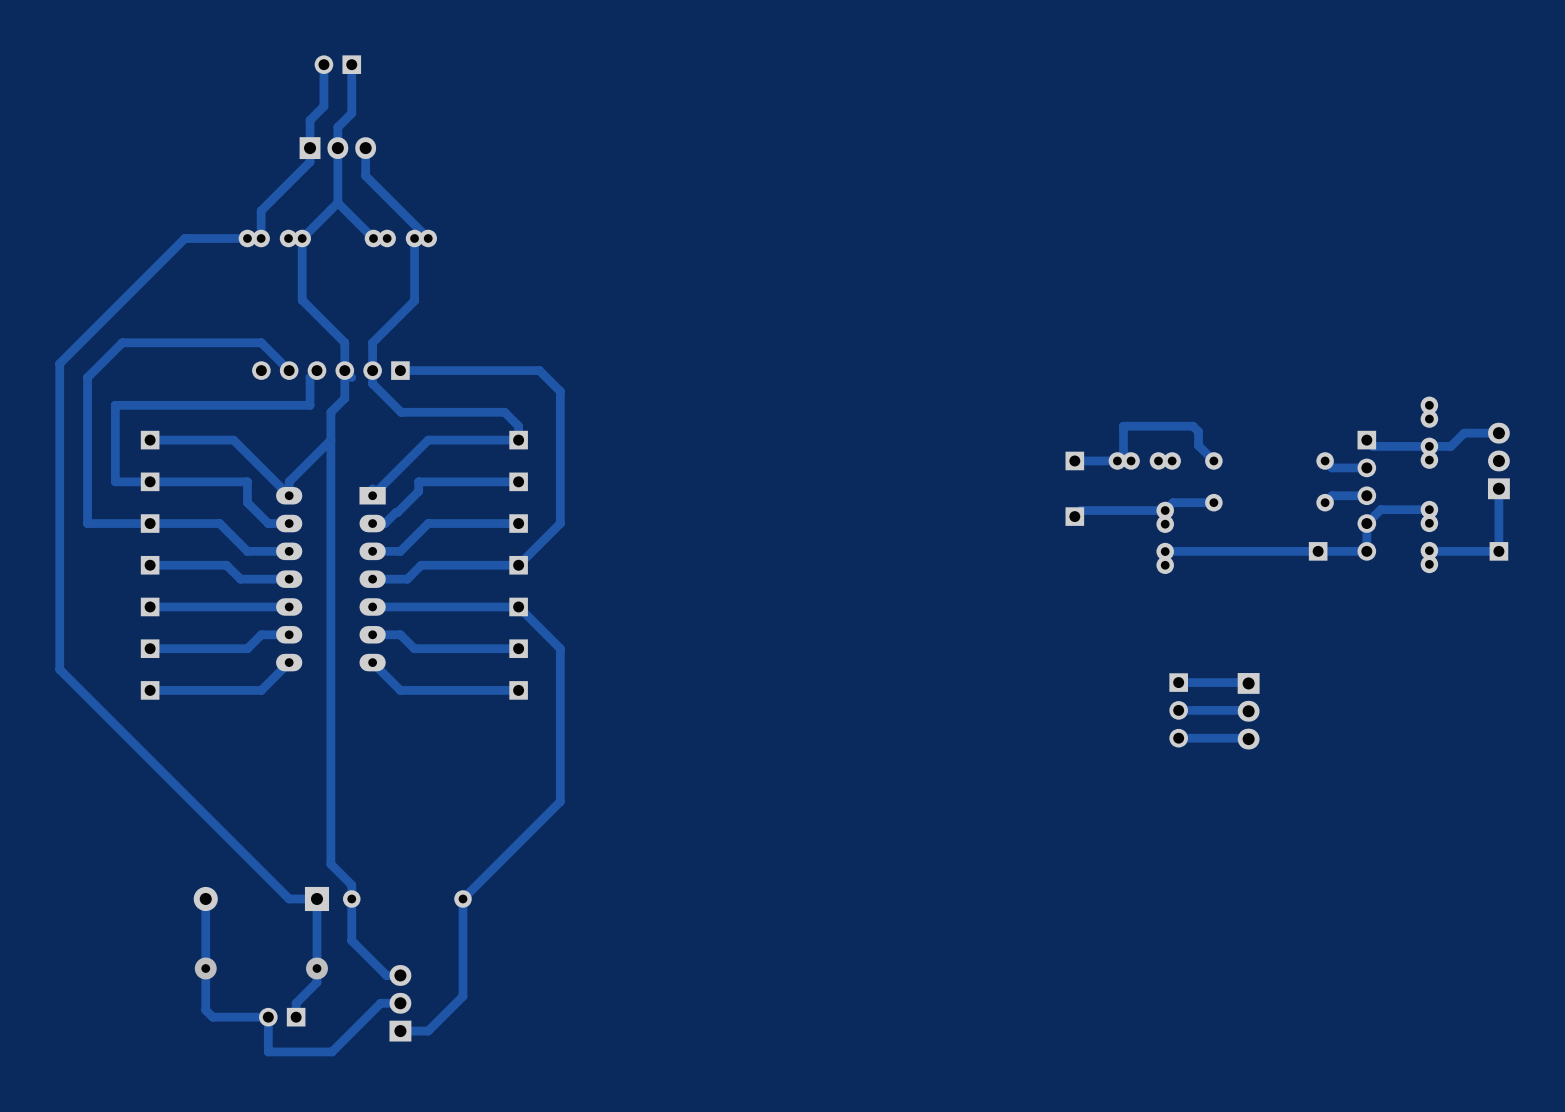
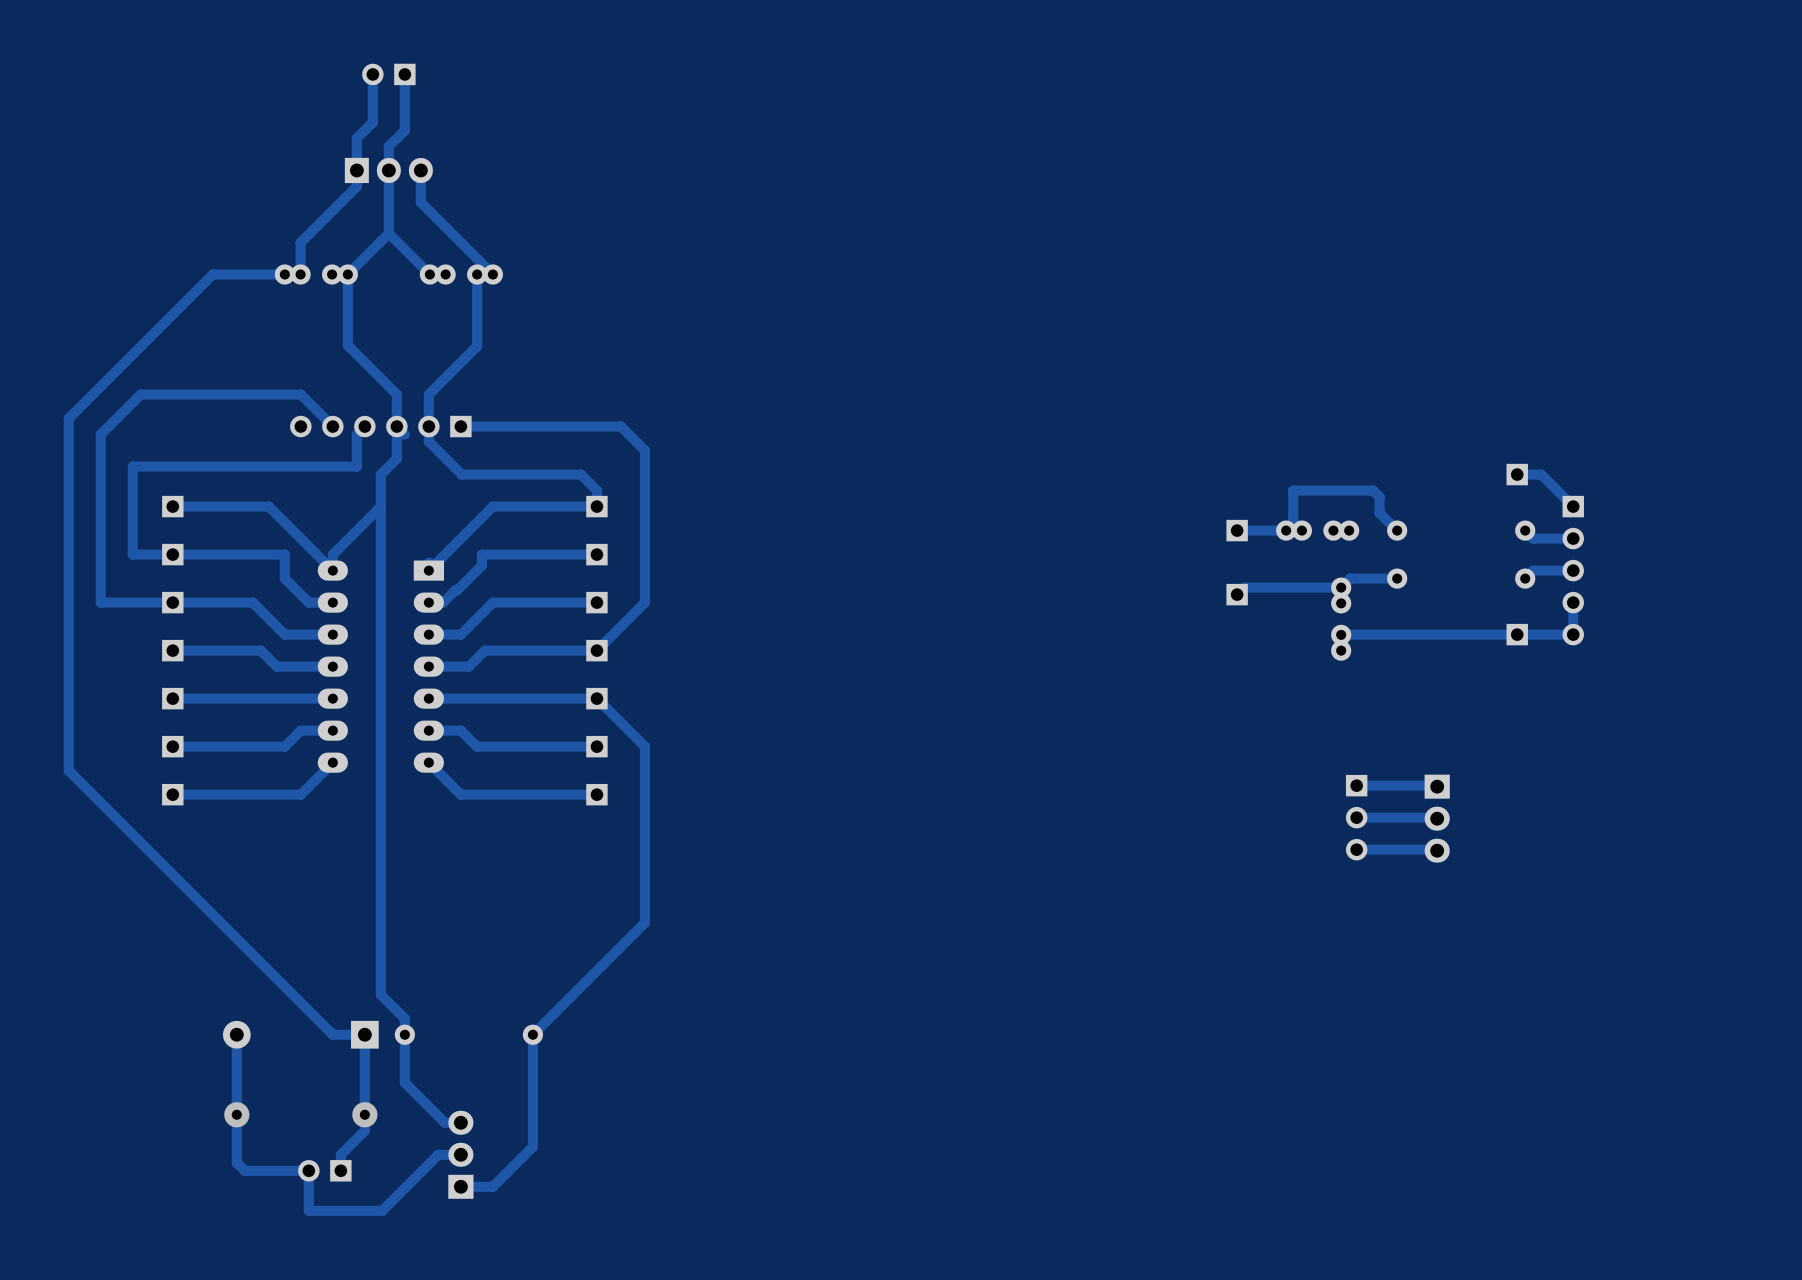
part: (1429, 432) -> none
track: (1498, 433) (1464, 433) (1450, 446) (1373, 446) (1366, 440) -> (1517, 474) (1541, 474) (1573, 506)
part: (1498, 460) -> none
track: (1498, 488) (1498, 551) (1429, 550) (1429, 564) -> none
track: (1429, 523) (1429, 509) (1380, 509) (1366, 523) -> none
part: (1429, 537) -> none
part position: (1498, 551) -> (1517, 474)

